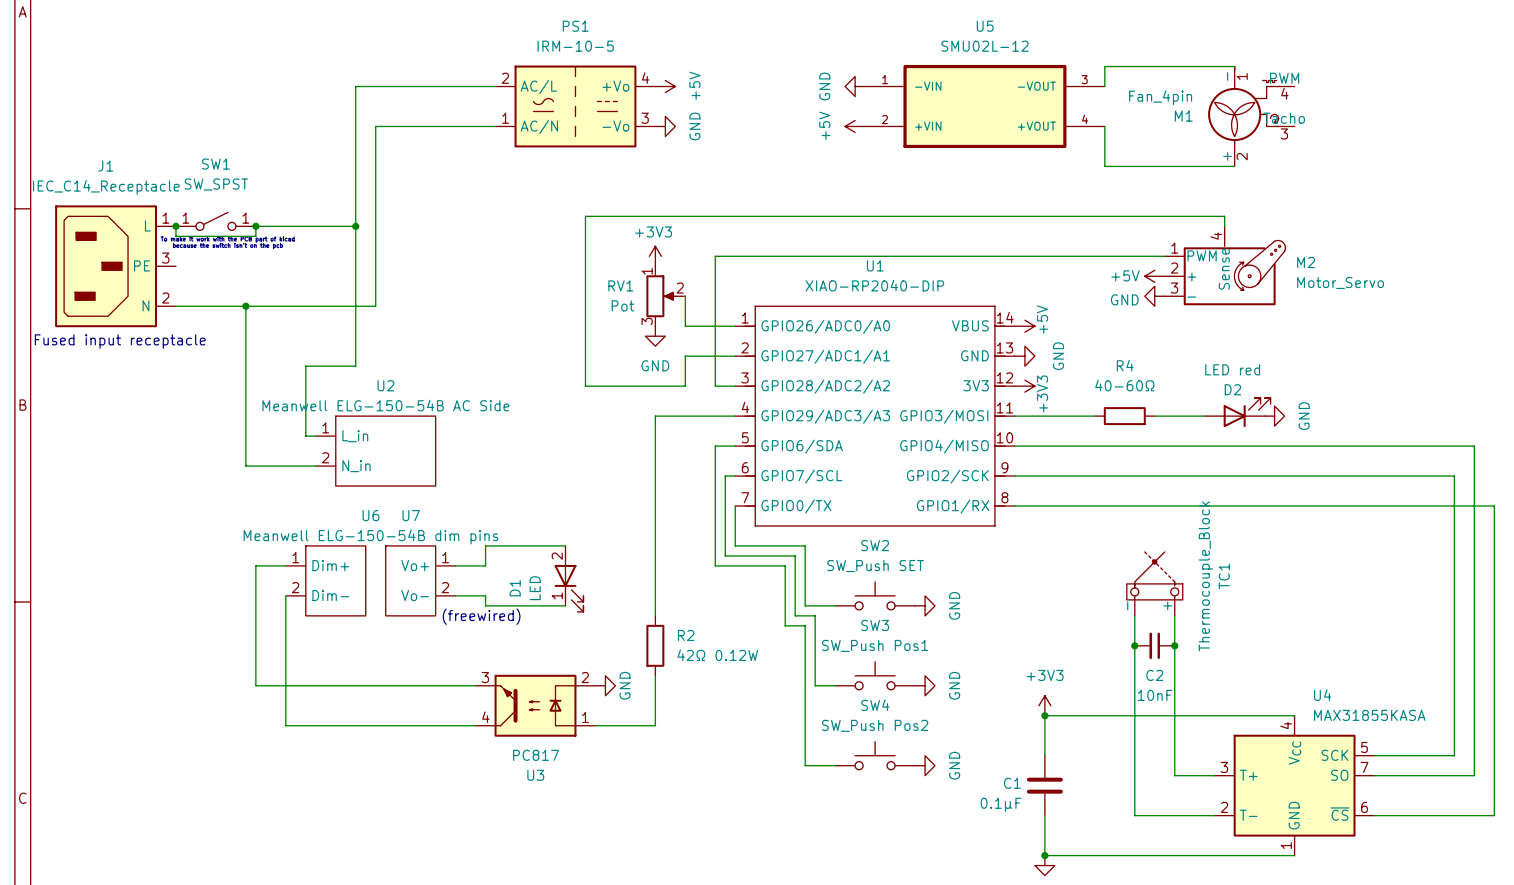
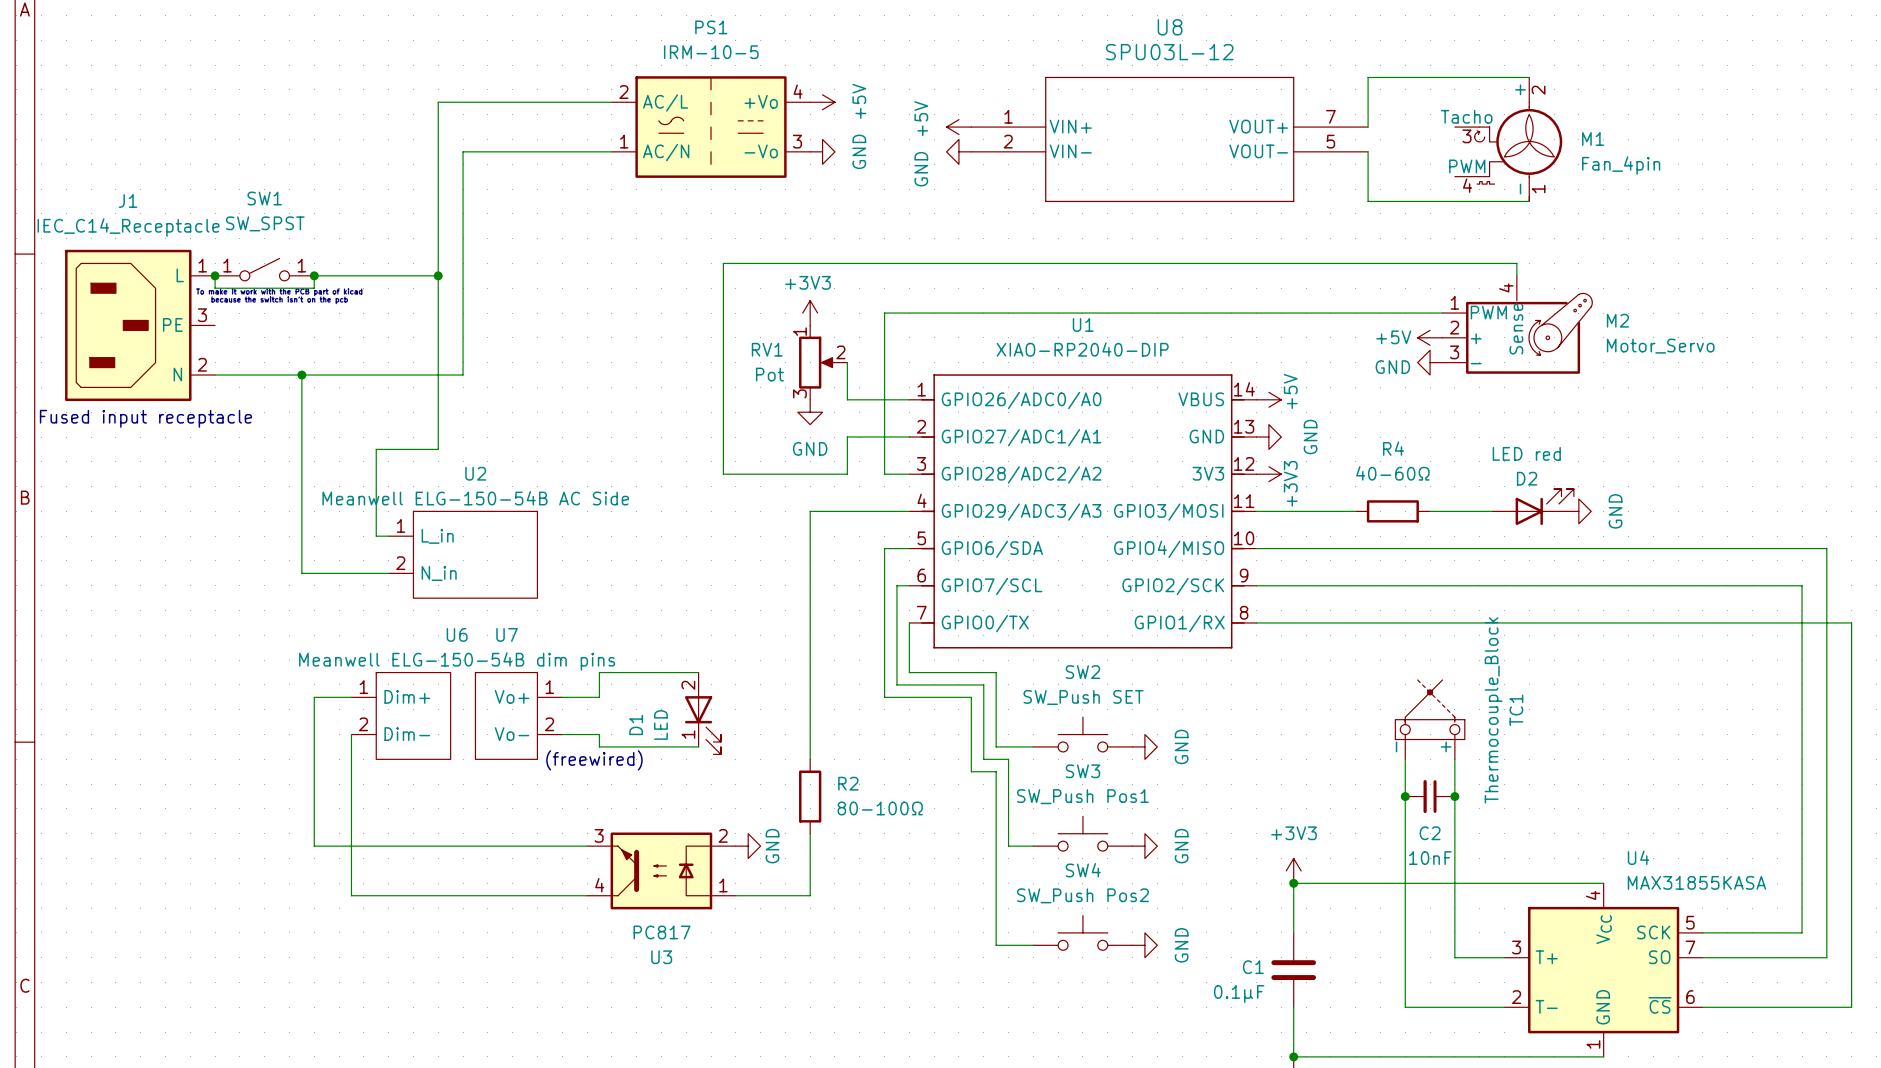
power symbol text position: GND (824, 86) -> GND (921, 169)
power symbol position: GND (855, 86) -> GND (958, 151)
wire: none -> (1368, 102) (1368, 127)
U5: SMU02L-12 (984, 106) -> none
M1 rotation: 0° (1243, 106) -> 180° (1518, 151)
U8: none -> SPU03L-12 (1169, 139)
power symbol text position: +5V (824, 125) -> +5V (921, 118)
power symbol position: +5V (855, 126) -> +5V (958, 127)
R2 value: 42Ω 0.12W (717, 655) -> 80-100Ω (880, 808)

